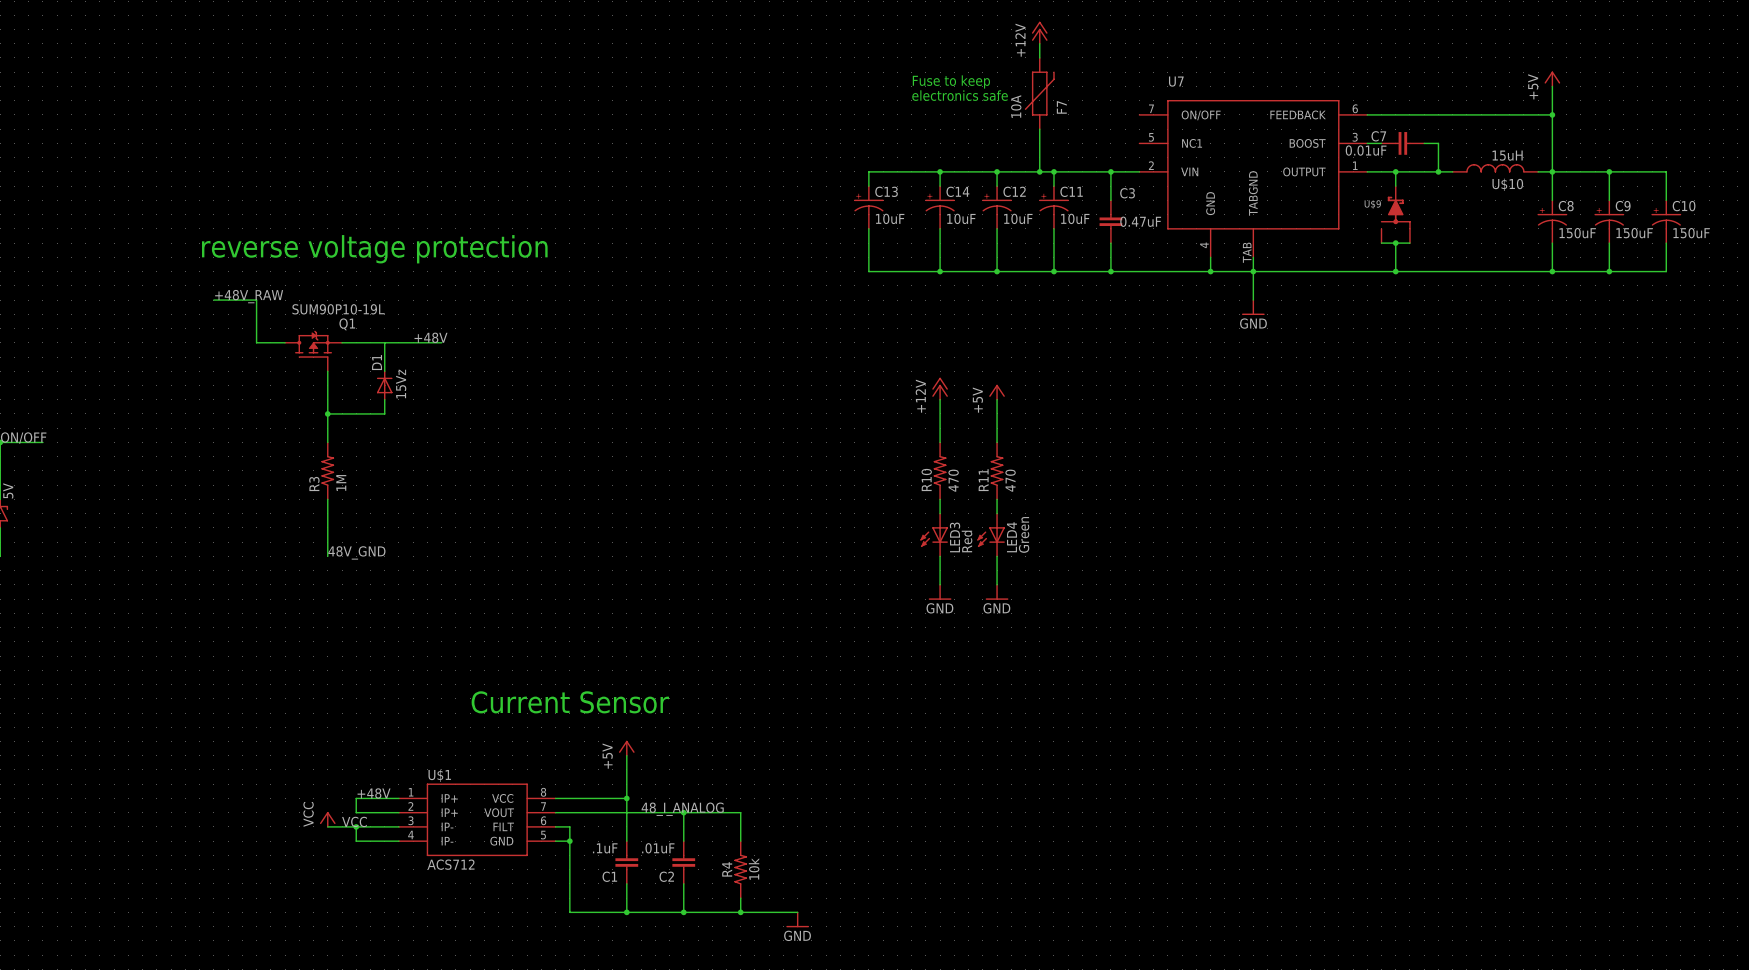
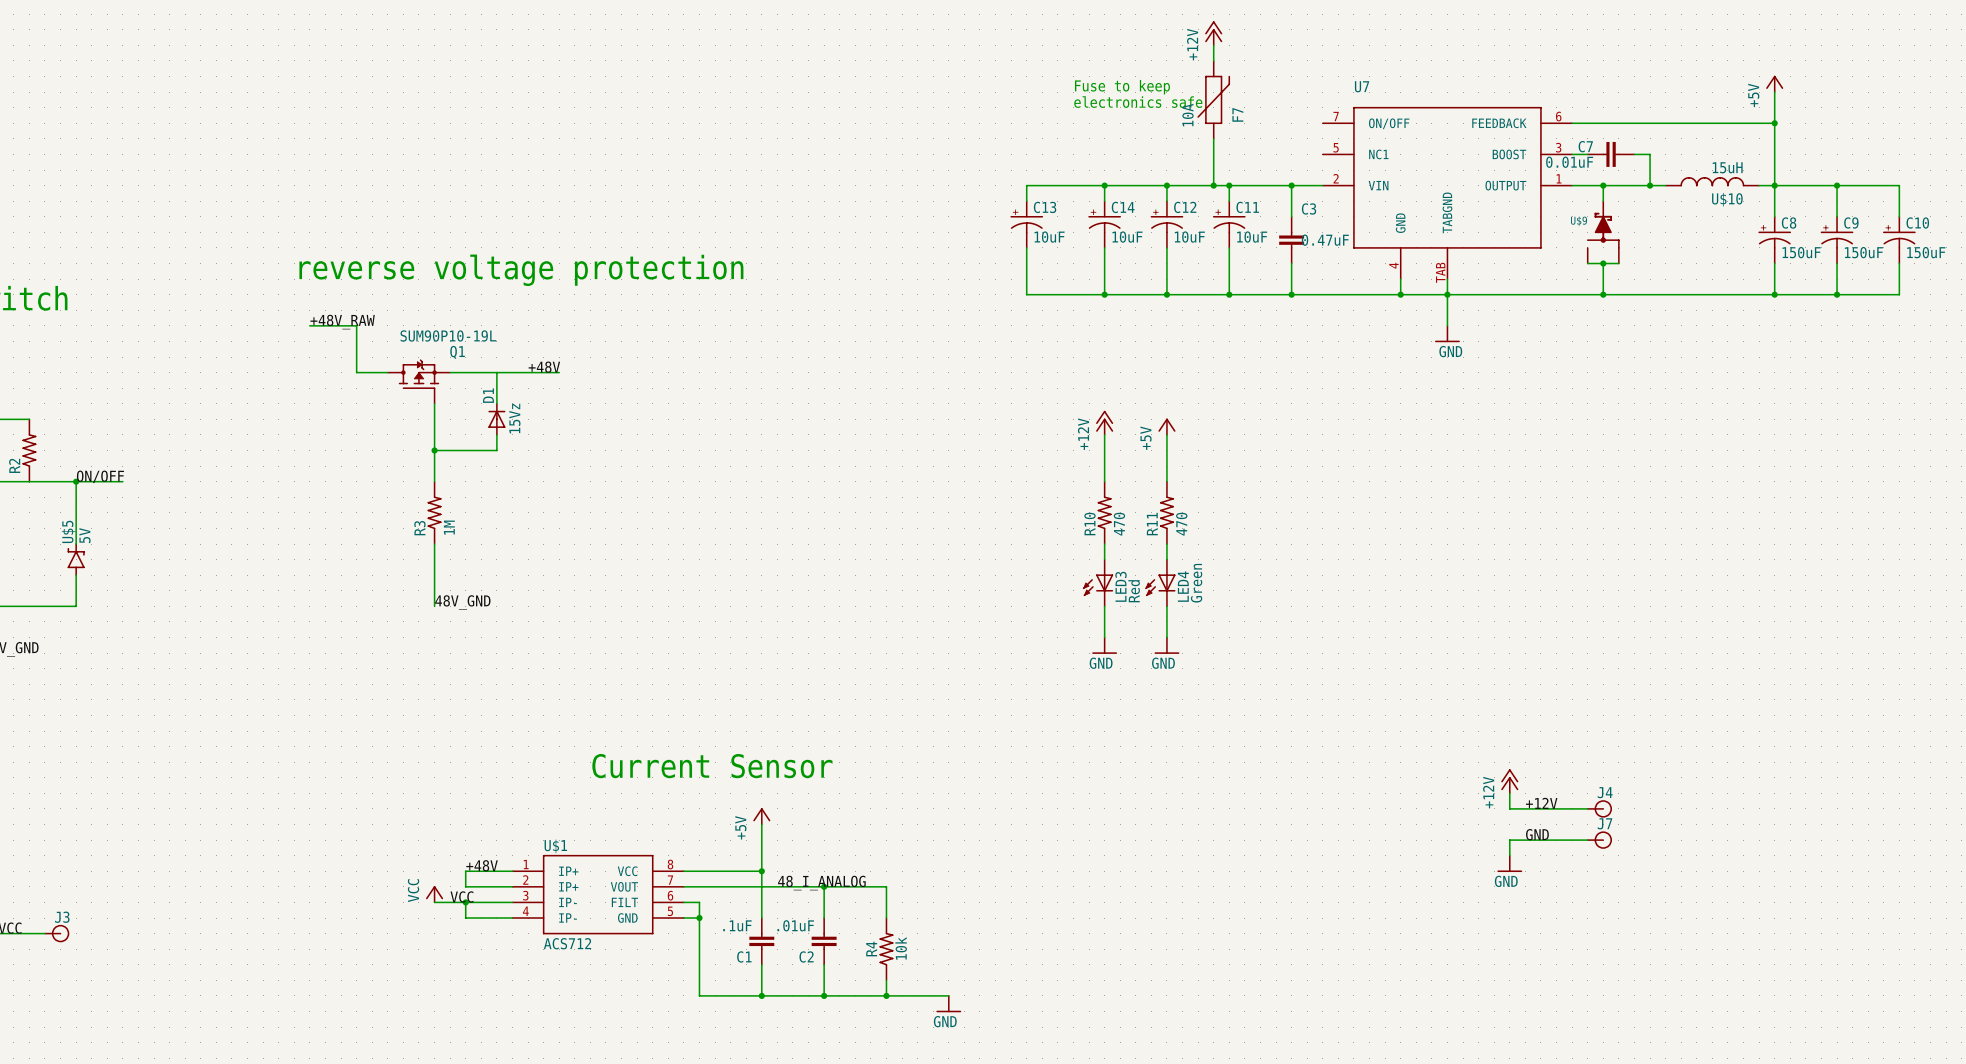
power symbol: none -> +12V (1509, 781)
wire: none -> (1509, 793) (1509, 808) (1587, 808)
label: none -> +12V (1541, 803)
J4: none -> (1599, 808)
label: none -> GND (1537, 834)
wire: none -> (1587, 840) (1509, 840) (1509, 855)
J7: none -> (1599, 840)
power symbol: none -> GND (1509, 863)

